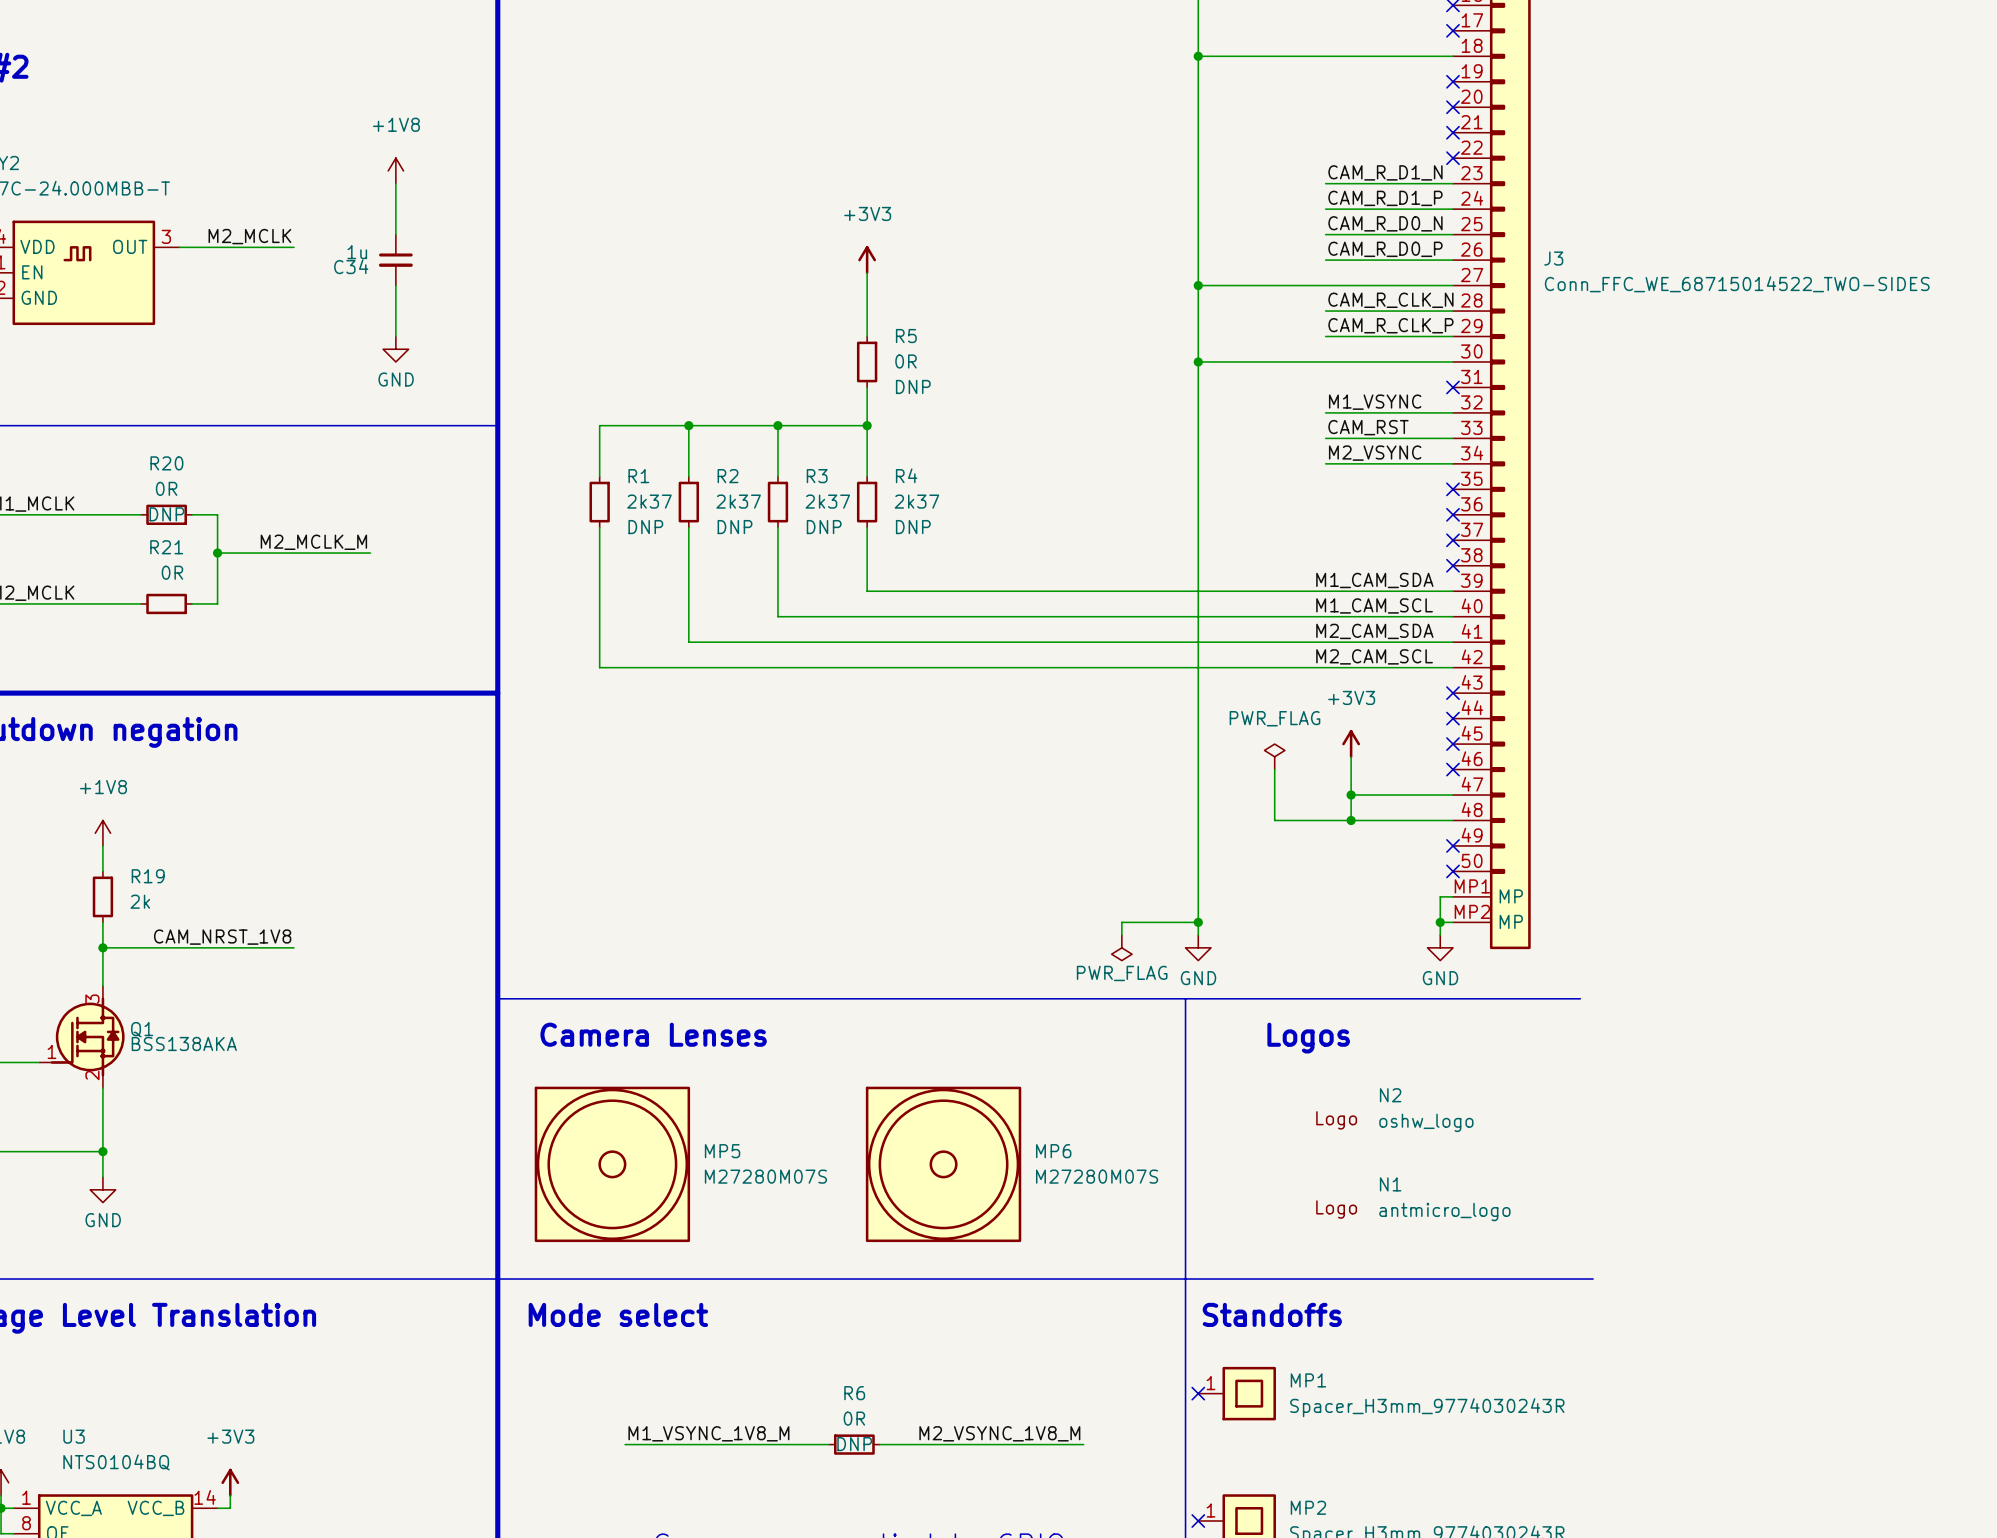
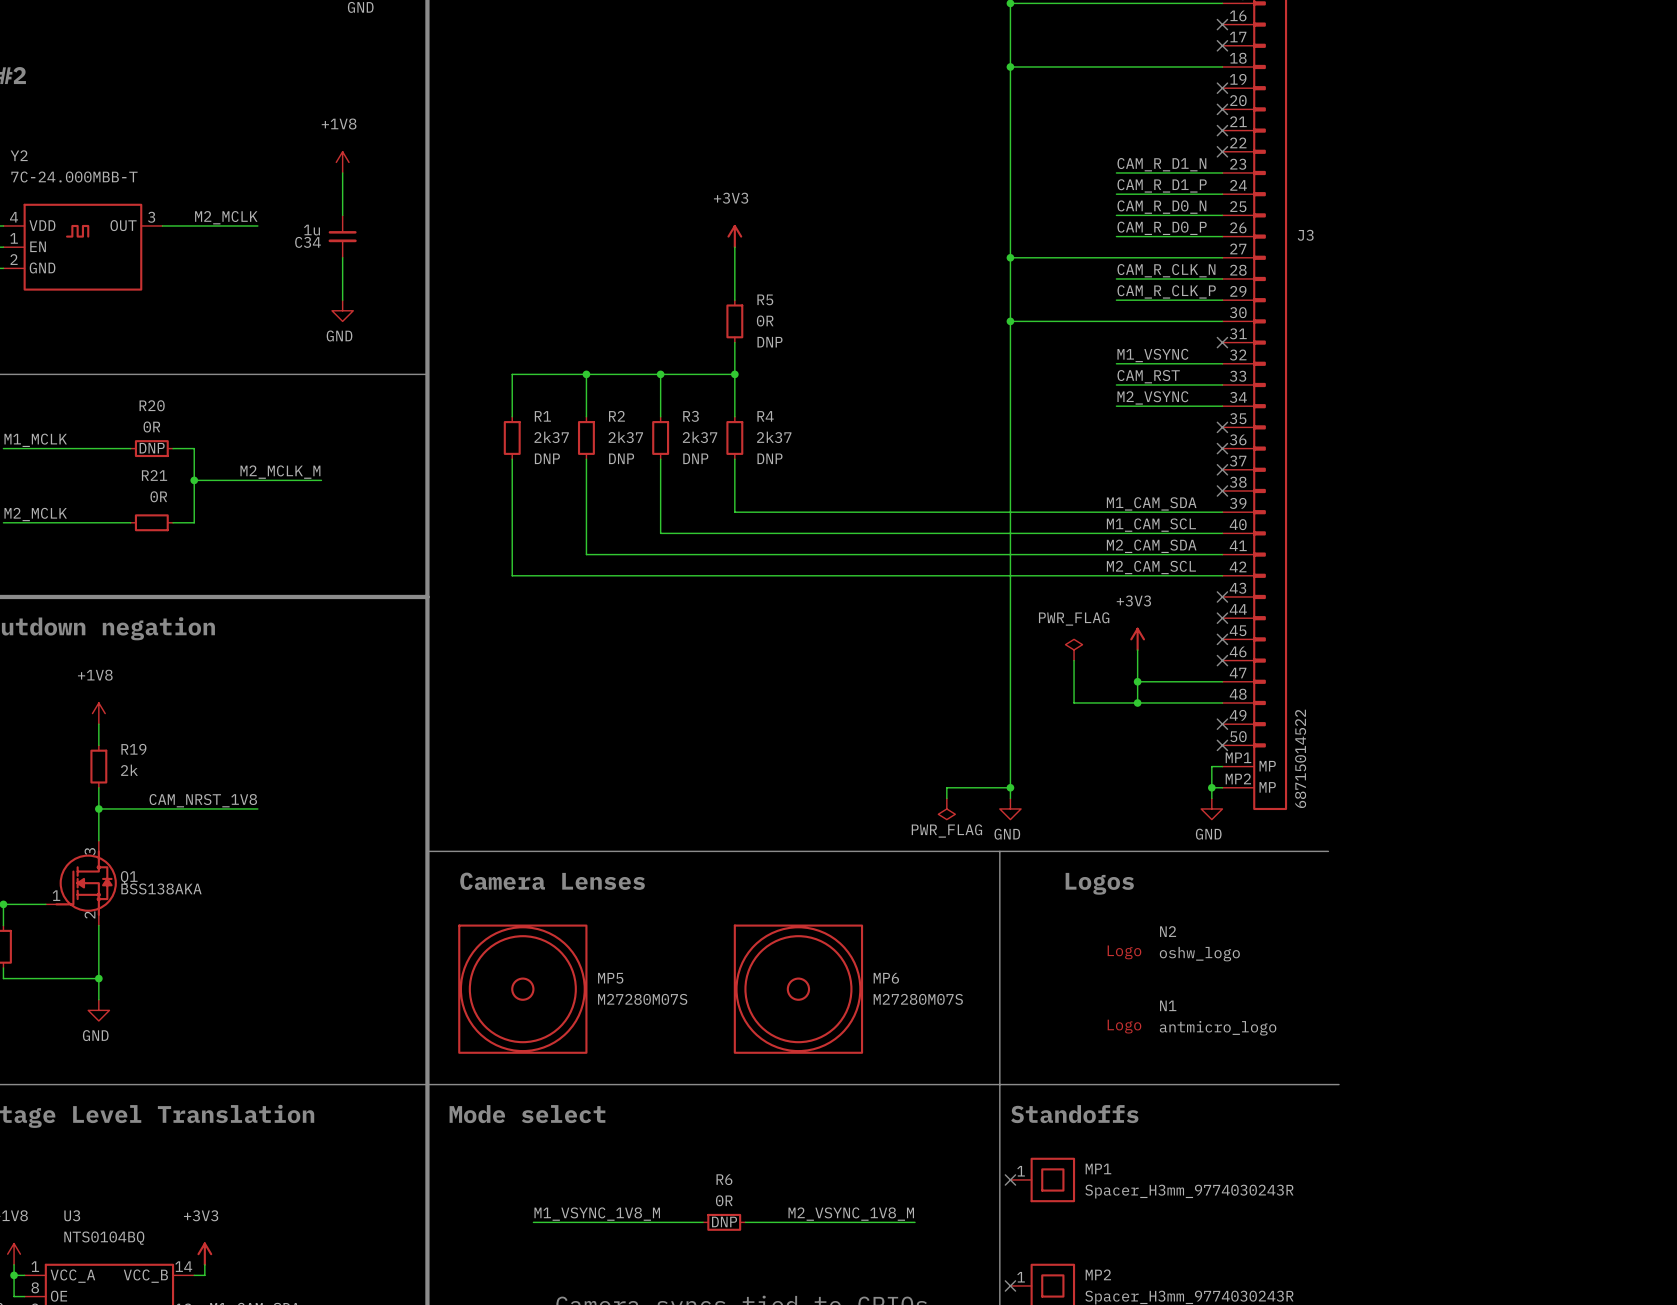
J3 value: Conn_FFC_WE_68715014522_TWO-SIDES (1737, 284) -> none
J3 text: none -> 68715014522 (1300, 758)

